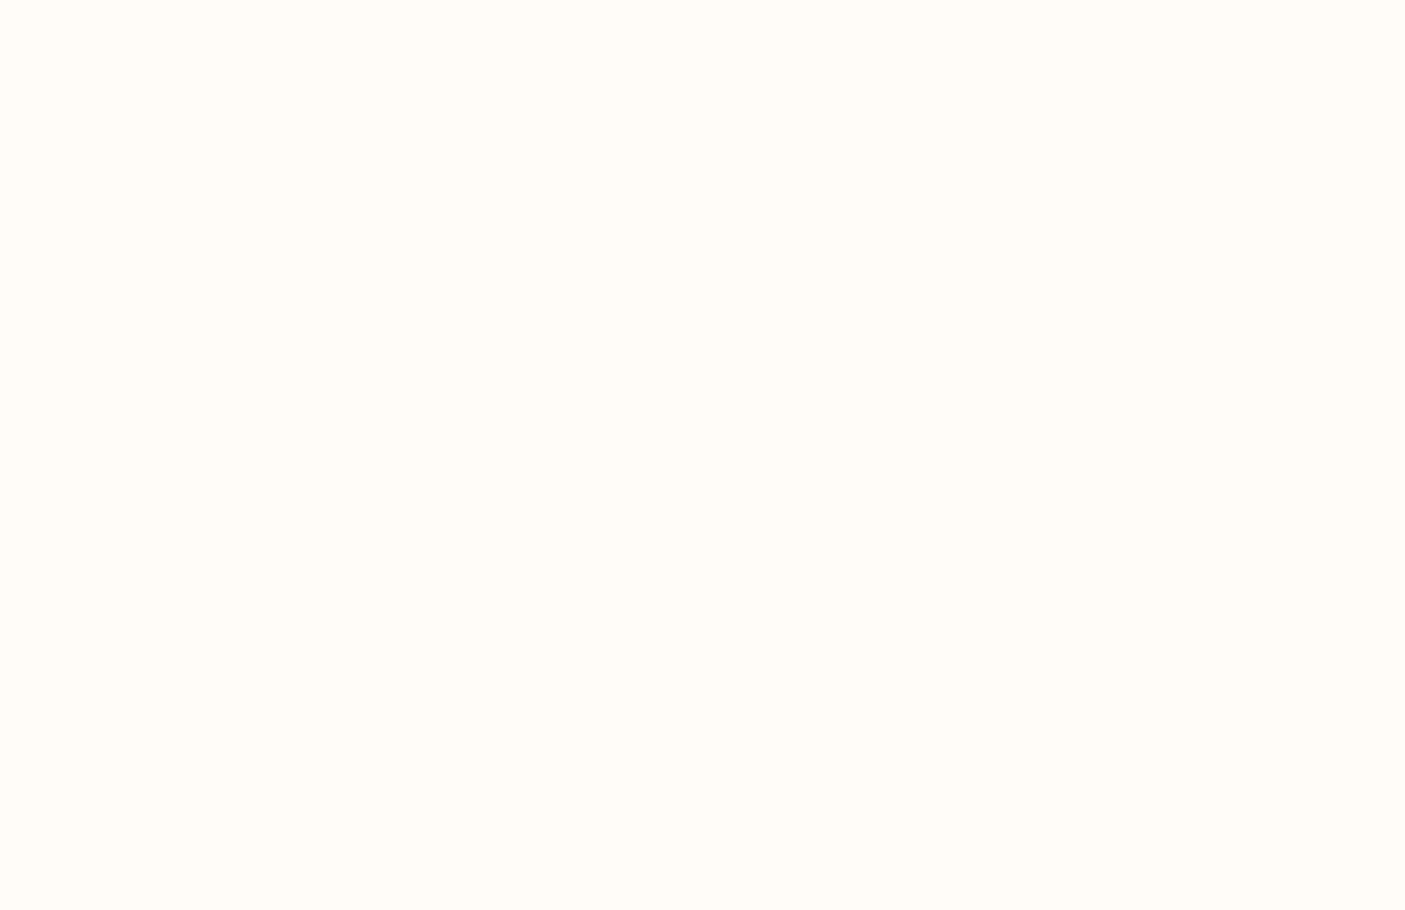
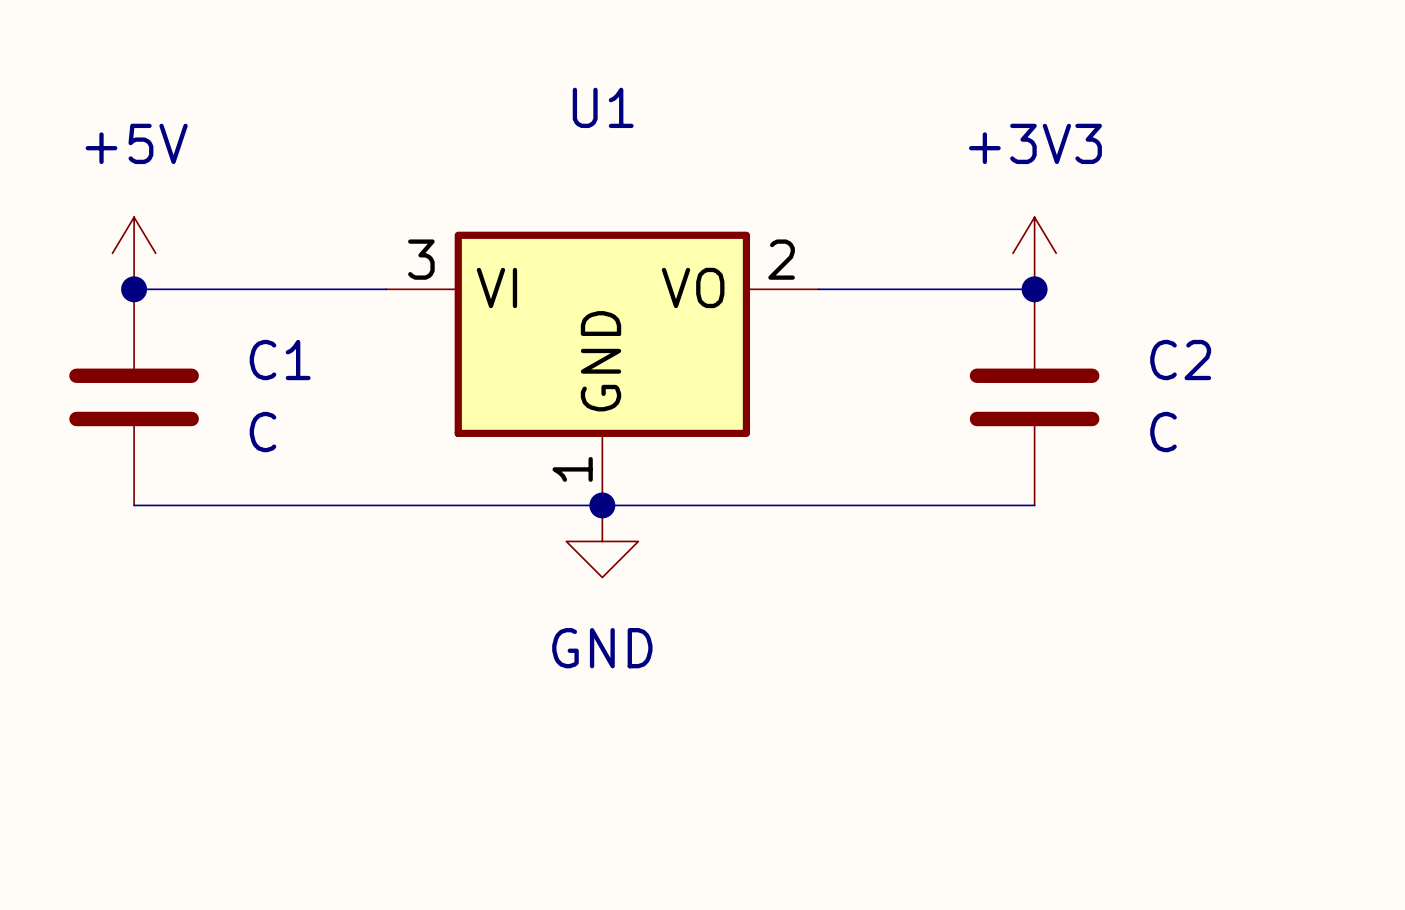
power symbol: none -> +5V (134, 253)
power symbol: none -> +3V3 (1034, 253)
wire: none -> (134, 289) (386, 289)
junction: none -> (134, 289)
wire: none -> (818, 289) (1034, 289)
junction: none -> (1034, 289)
U1: none -> (602, 368)
C1: none -> C (134, 397)
C2: none -> C (1034, 397)
wire: none -> (134, 505) (1034, 505)
junction: none -> (602, 505)
power symbol: none -> GND (602, 541)

